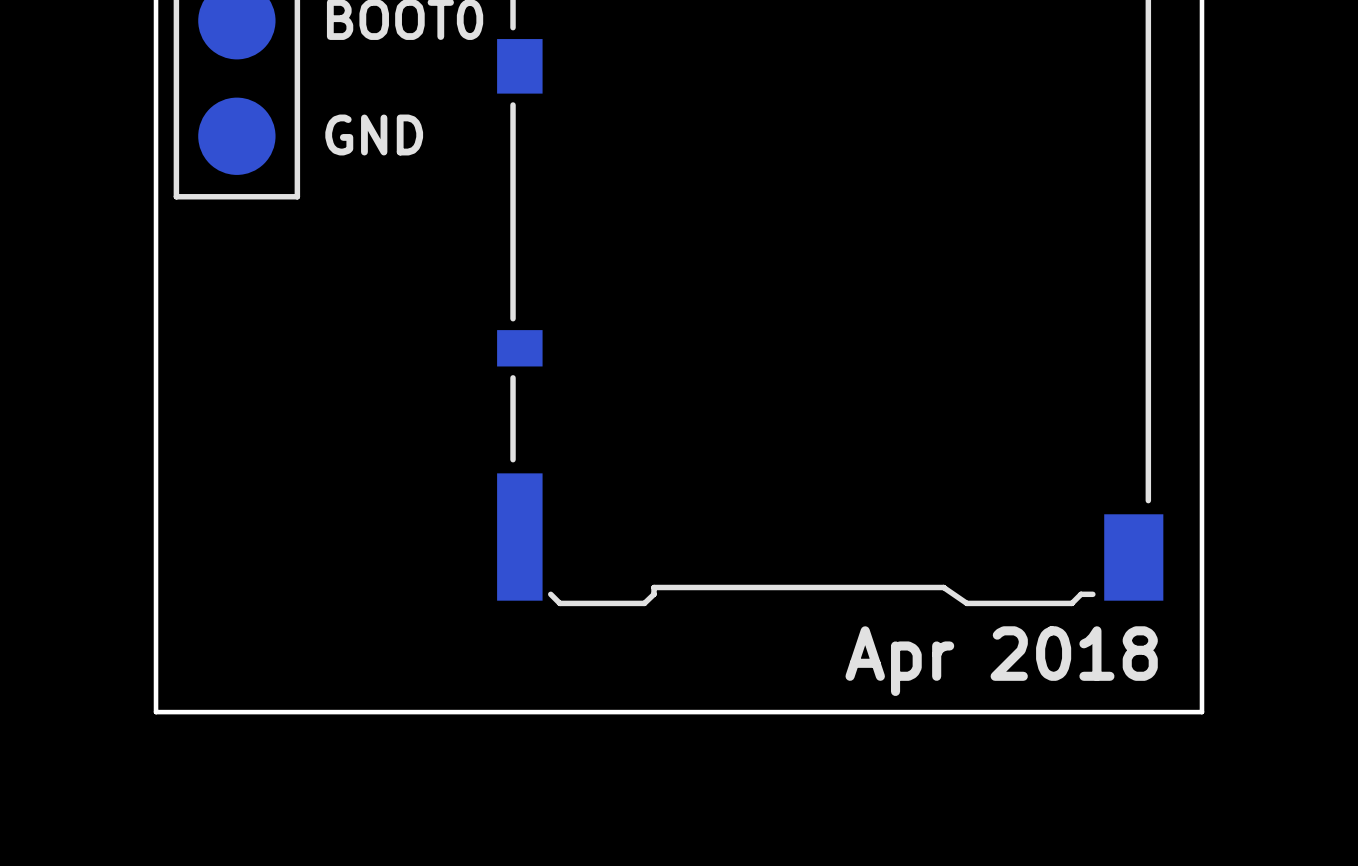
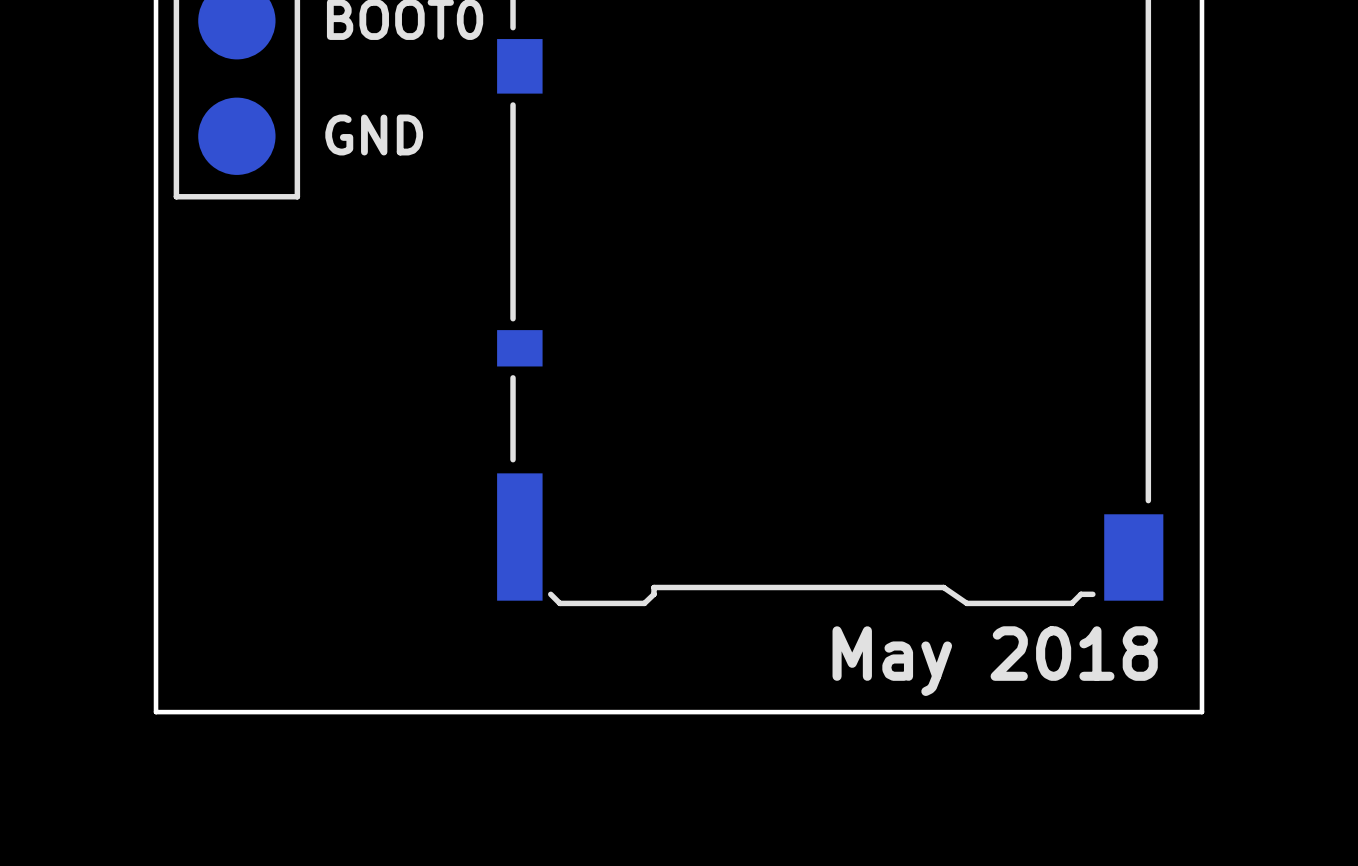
text: Apr 2018 (1001, 661) -> May 2018 (995, 661)

